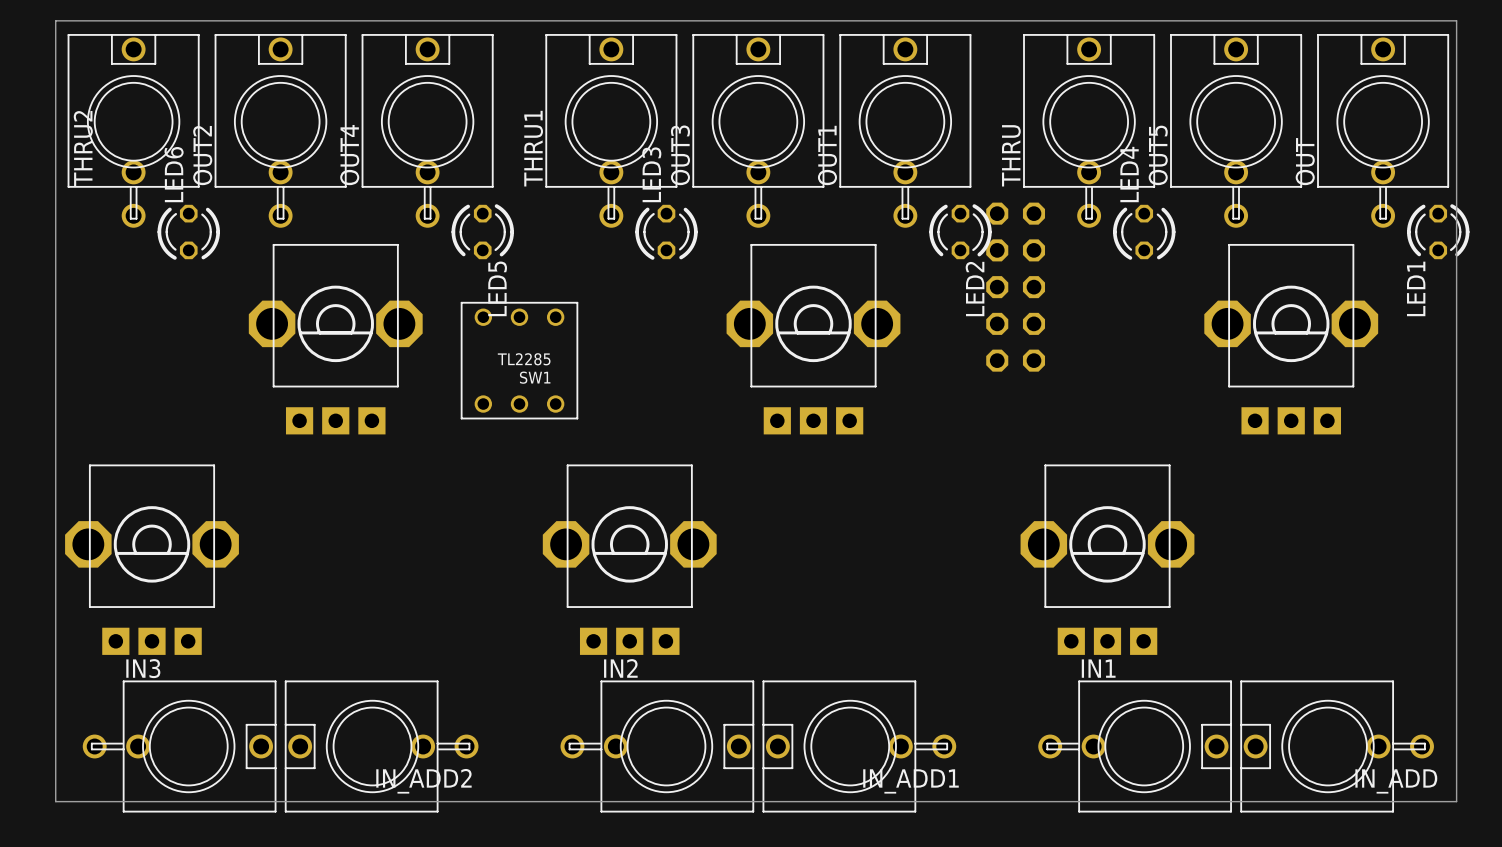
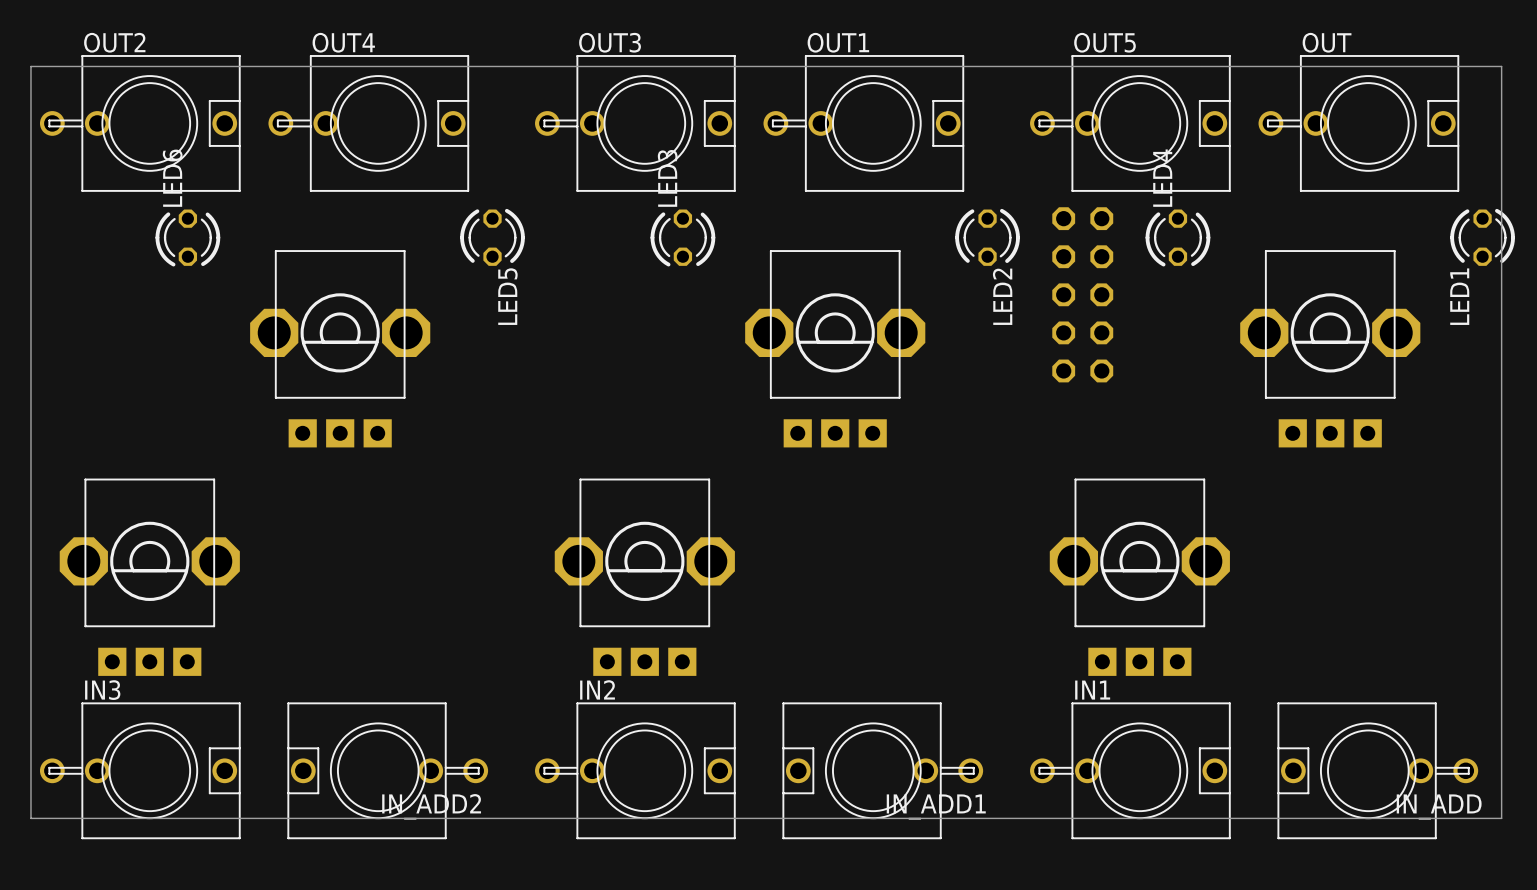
board edge: (1456, 66) (1456, 20) (55, 20) (55, 801) (1456, 801) (1456, 792) -> (1501, 66) (30, 66) (30, 818) (1501, 818)
THRU2: (133, 130) -> none
OUT2 rotation: 0° (280, 130) -> 90° clockwise (140, 123)
OUT2 position: (280, 130) -> (140, 123)
OUT4 rotation: 0° (427, 130) -> 90° clockwise (368, 123)
THRU1: (611, 130) -> none
OUT3 rotation: 0° (758, 130) -> 90° clockwise (635, 123)
OUT3 position: (758, 130) -> (635, 123)
OUT1 rotation: 0° (905, 130) -> 90° clockwise (863, 123)
THRU: (1089, 130) -> none
OUT5 rotation: 0° (1236, 130) -> 90° clockwise (1130, 123)
OUT5 position: (1236, 130) -> (1130, 123)
OUT rotation: 0° (1383, 130) -> 90° clockwise (1358, 123)
part position: (1015, 287) -> (1082, 294)
SW1: TL2285 (519, 360) -> none
IN3 position: (179, 746) -> (140, 770)
IN2 position: (657, 746) -> (635, 770)
IN1 position: (1135, 746) -> (1130, 770)

